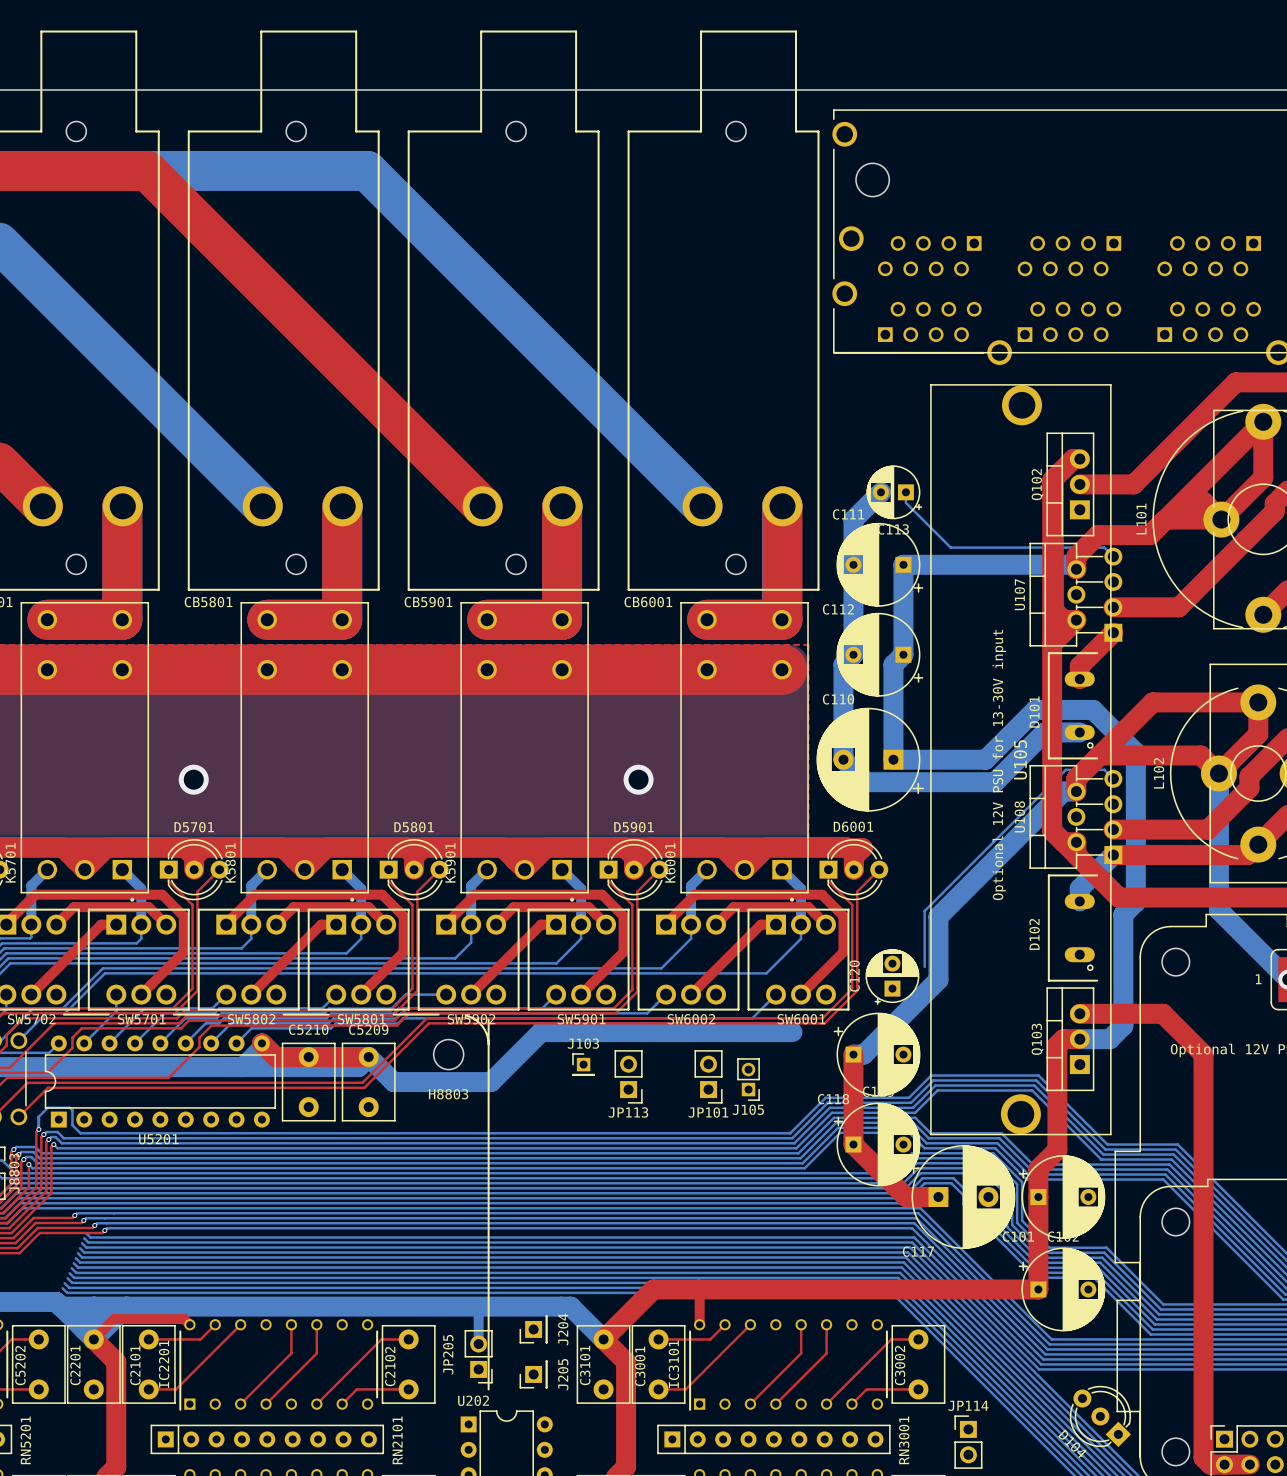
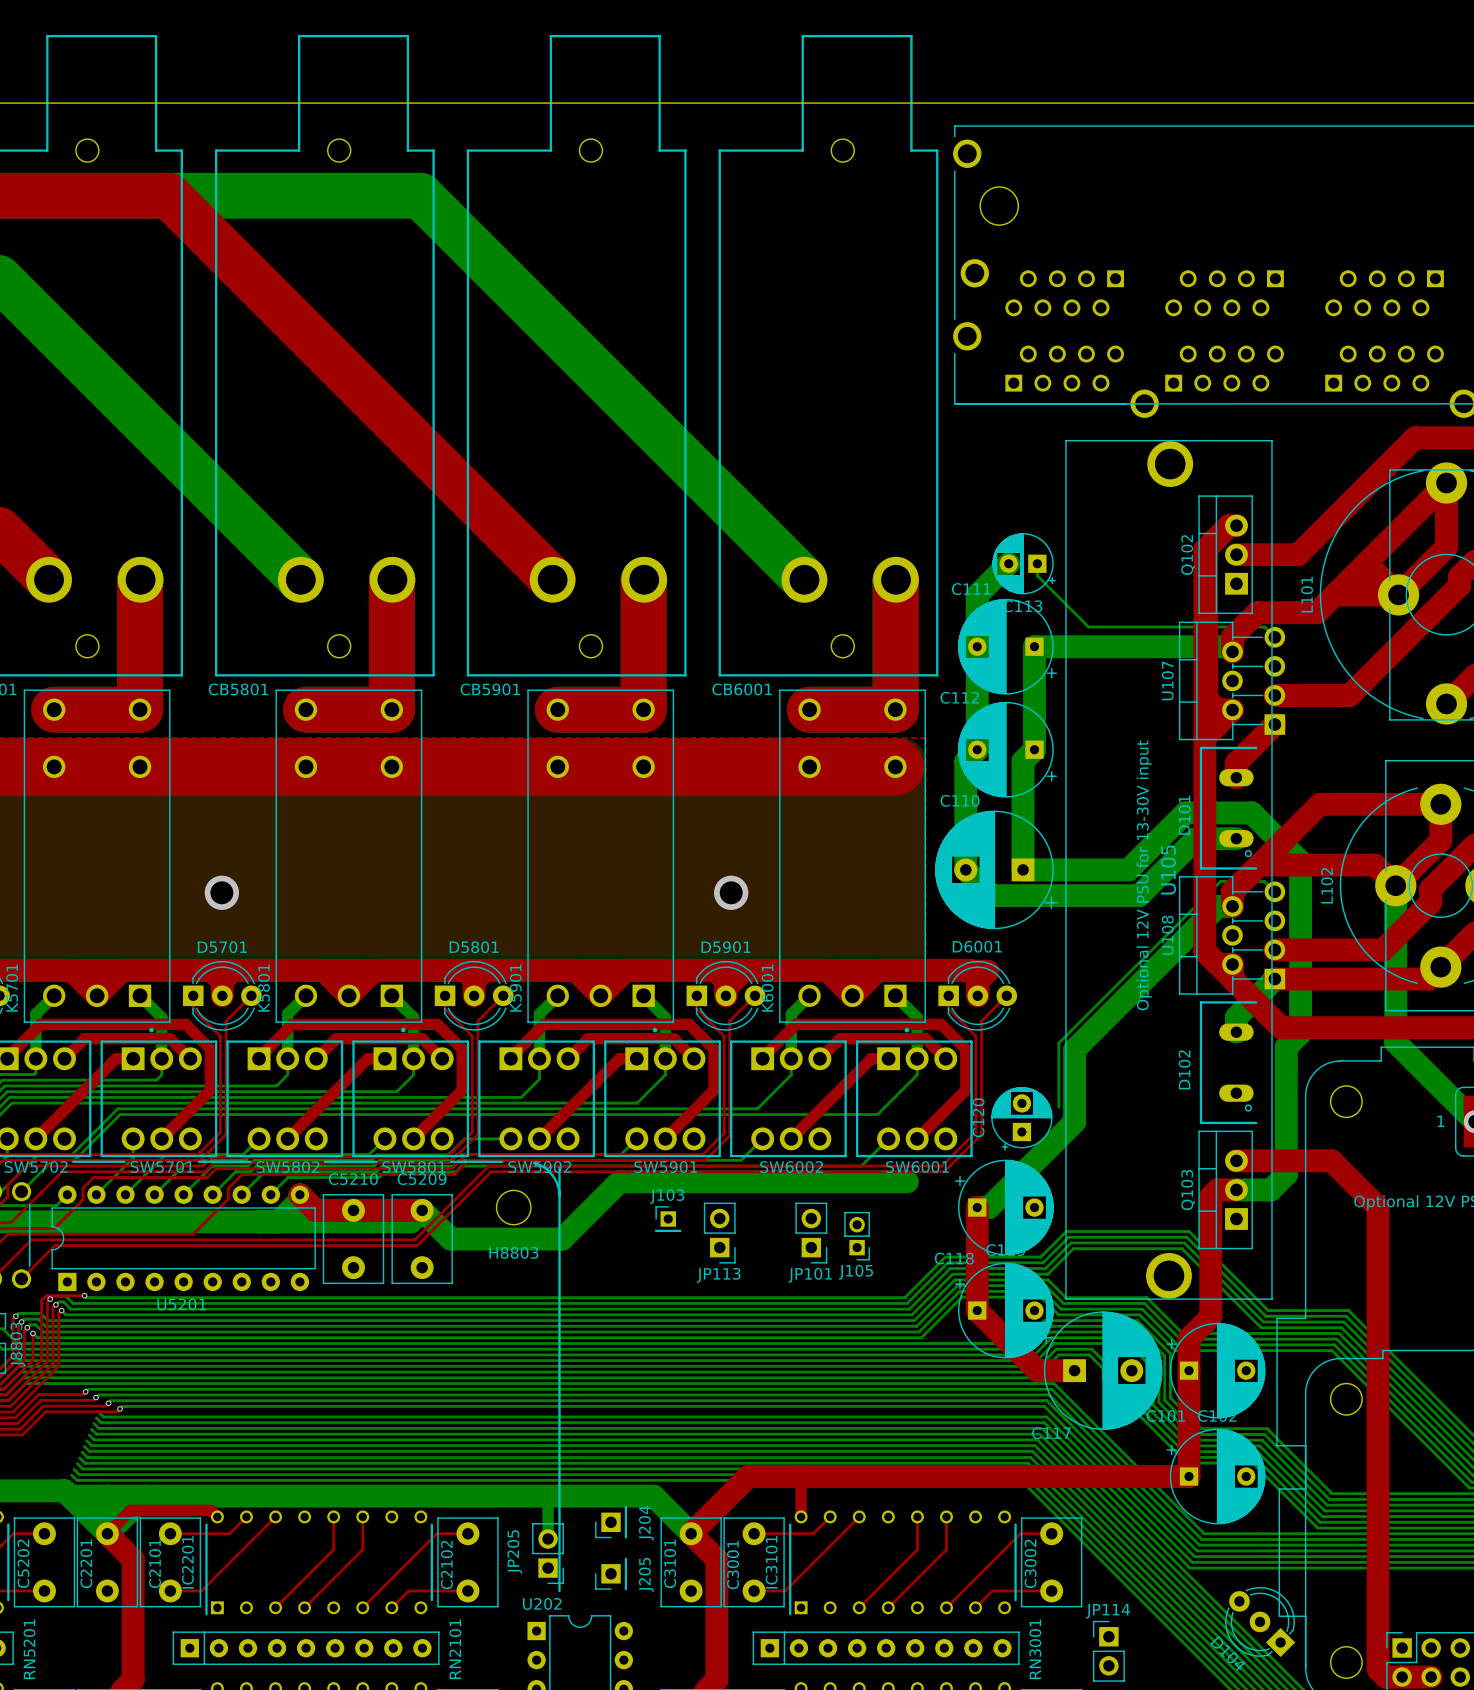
top track: (38, 1129) (36, 1135) -> (84, 1295) (46, 1295) (41, 1300)
bottom track: (38, 1129) (38, 1116) (47, 1107) (69, 1107) (72, 1110) (72, 1125) (80, 1133) -> (84, 1295) (92, 1297)
via position: (38, 1129) -> (84, 1295)

